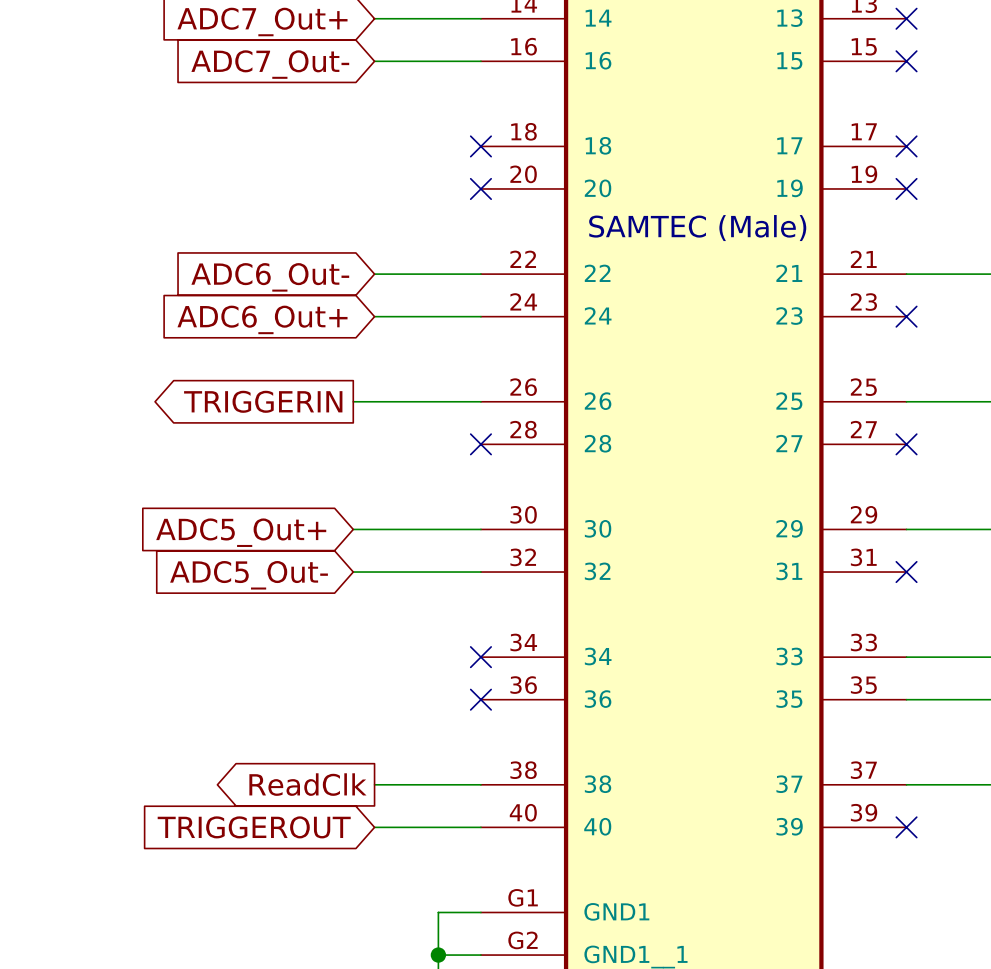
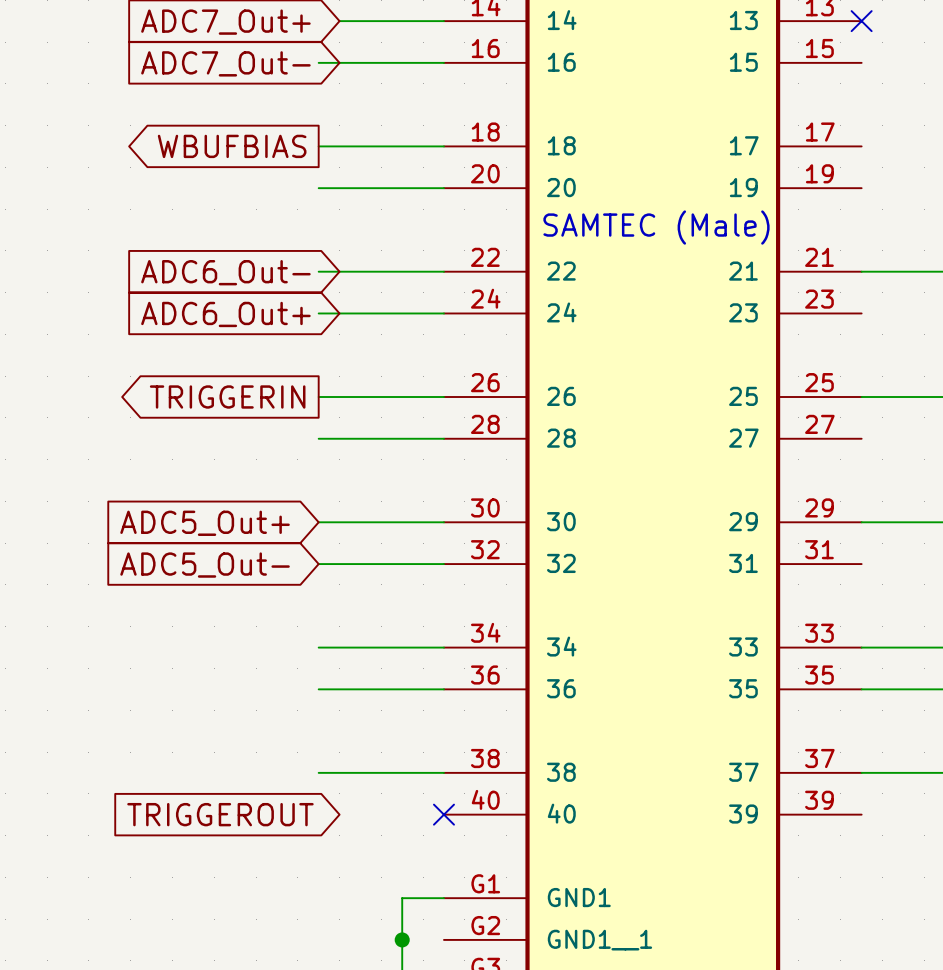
wire: none -> (318, 62) (339, 62)
no-connect mark: (906, 61) -> none
global label: none -> WBUFBIAS (232, 146)
wire: none -> (318, 146) (443, 146)
no-connect mark: (480, 146) -> none
no-connect mark: (906, 146) -> none
wire: none -> (318, 188) (443, 188)
no-connect mark: (480, 188) -> none
no-connect mark: (906, 188) -> none
wire: none -> (318, 271) (339, 271)
wire: none -> (318, 313) (339, 313)
no-connect mark: (906, 316) -> none
wire: none -> (318, 438) (443, 438)
no-connect mark: (480, 444) -> none
no-connect mark: (906, 444) -> none
no-connect mark: (906, 572) -> none
wire: none -> (318, 647) (443, 647)
no-connect mark: (480, 657) -> none
wire: none -> (318, 689) (443, 689)
no-connect mark: (480, 699) -> none
global label: ReadClk (307, 784) -> none
wire: none -> (318, 772) (339, 772)
wire: (374, 827) (480, 827) -> none
no-connect mark: none -> (443, 814)
no-connect mark: (906, 827) -> none
wire: (438, 955) (480, 955) -> none

